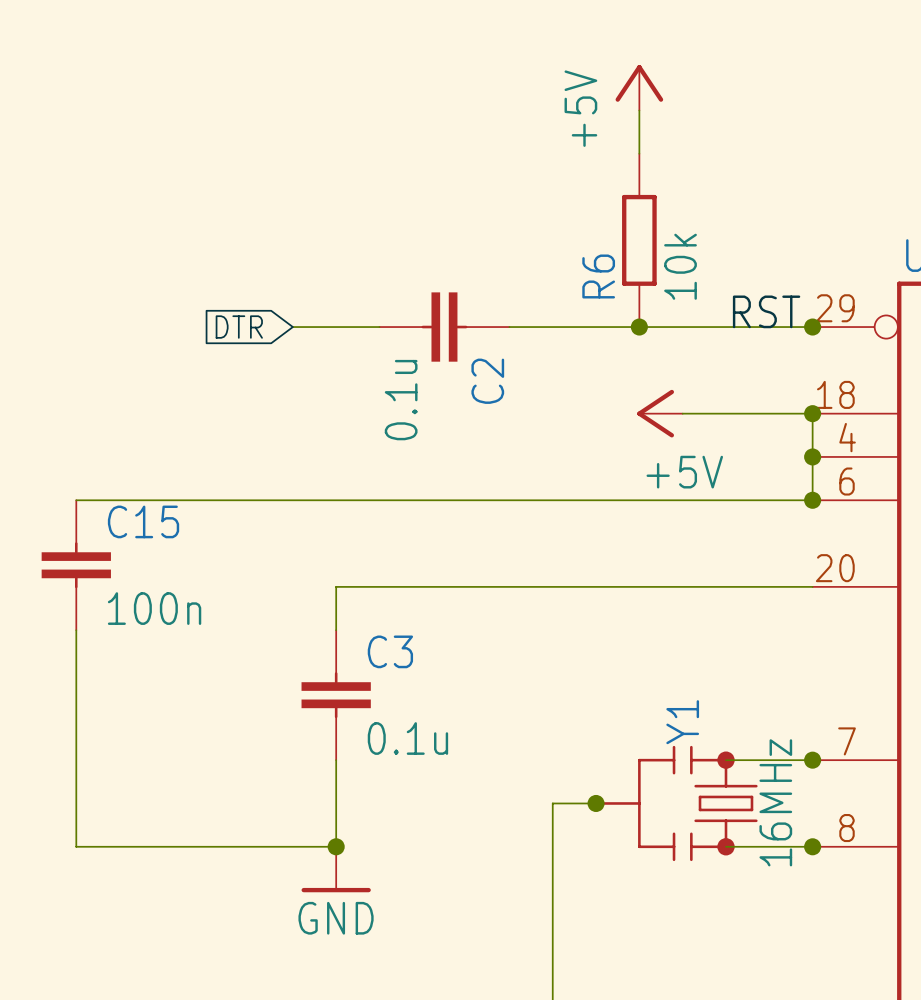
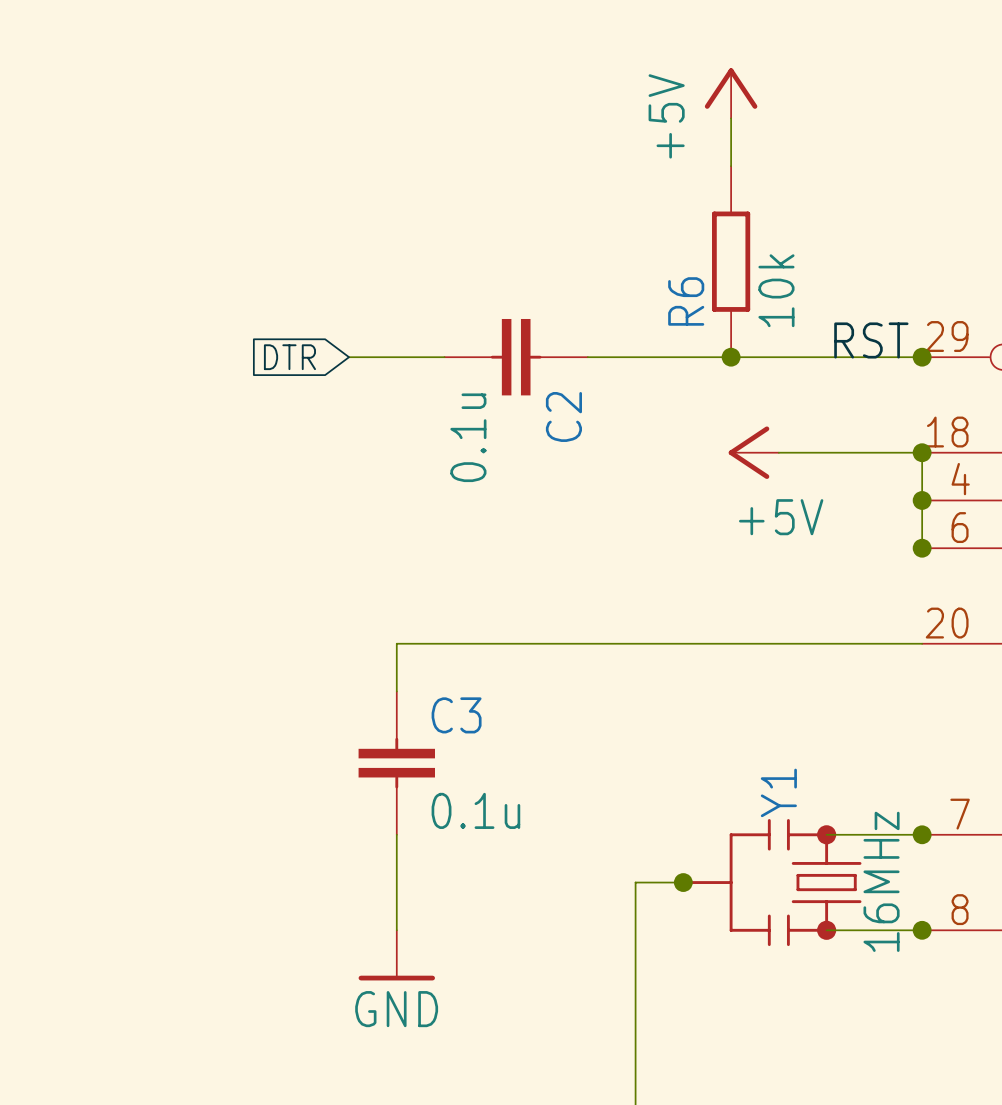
wire: (76, 500) (812, 500) -> none
C15: 100n (76, 565) -> none
wire: (76, 630) (76, 846) (336, 846) -> none
junction: (336, 846) -> none

